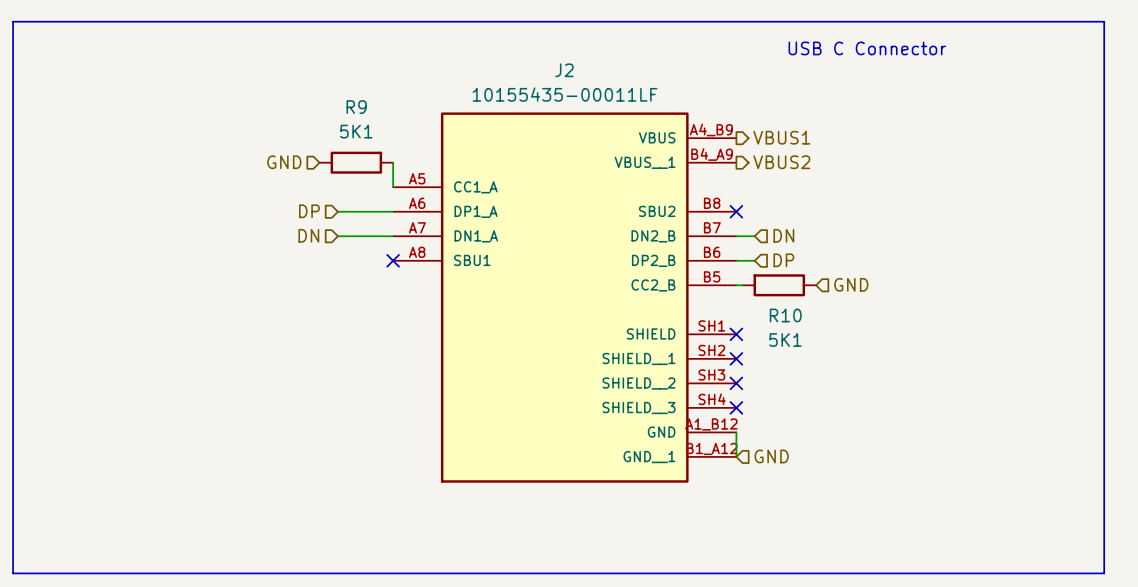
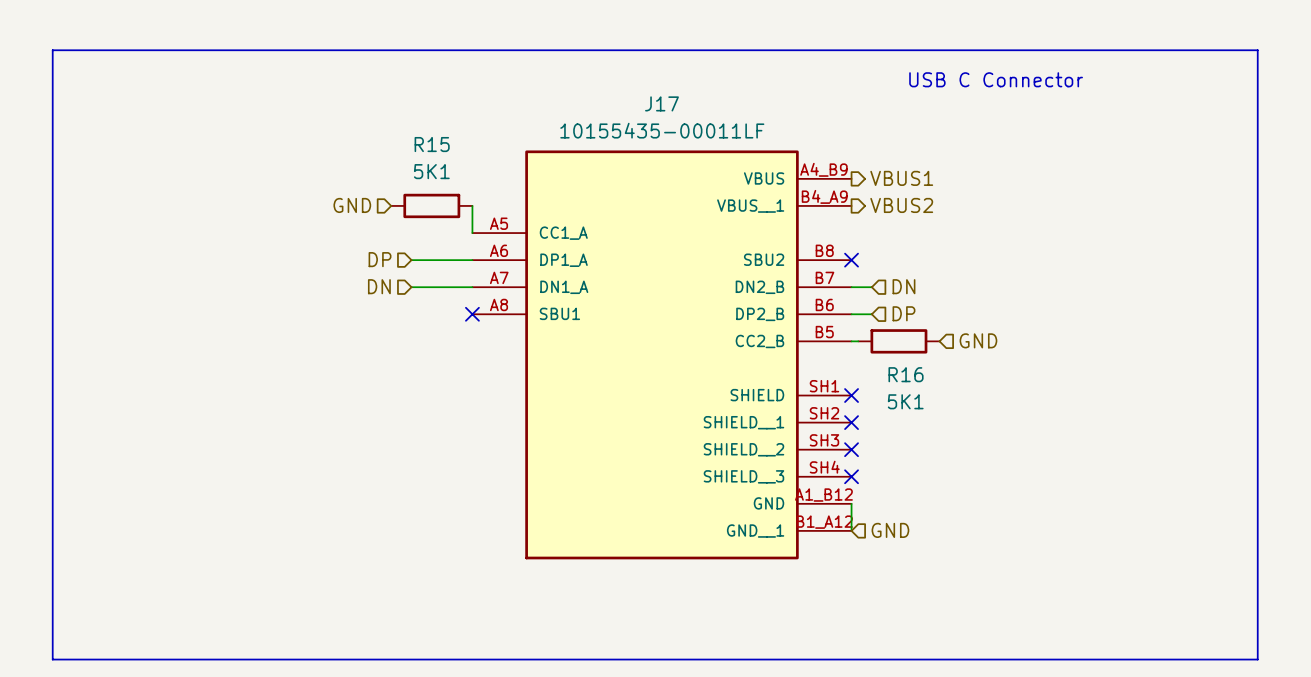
J2 name: J2 (564, 70) -> J17 (661, 103)
R9 name: R9 (356, 107) -> R15 (432, 144)
R10 name: R10 (785, 315) -> R16 (906, 374)

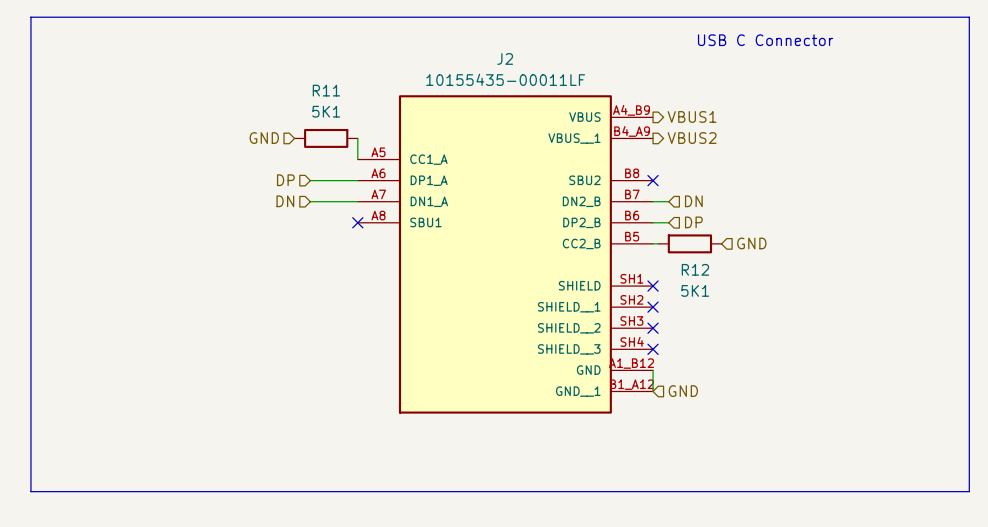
J17 name: J17 (661, 103) -> J2 (505, 58)
R15 name: R15 (432, 144) -> R11 (326, 90)
R16 name: R16 (906, 374) -> R12 (695, 269)

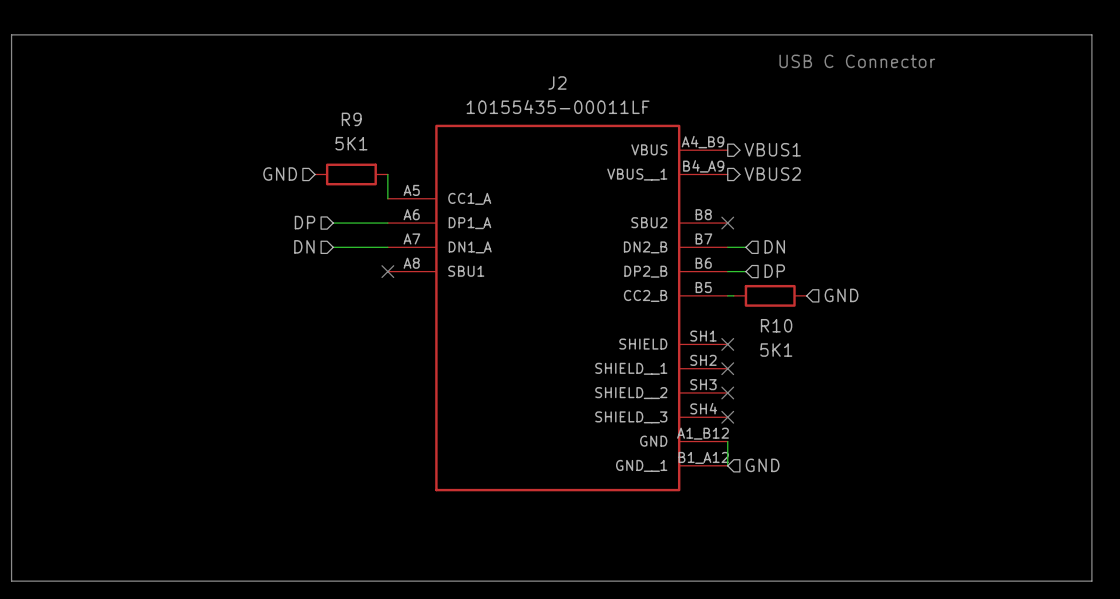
R11 name: R11 (326, 90) -> R9 (351, 119)
R12 name: R12 (695, 269) -> R10 (776, 325)

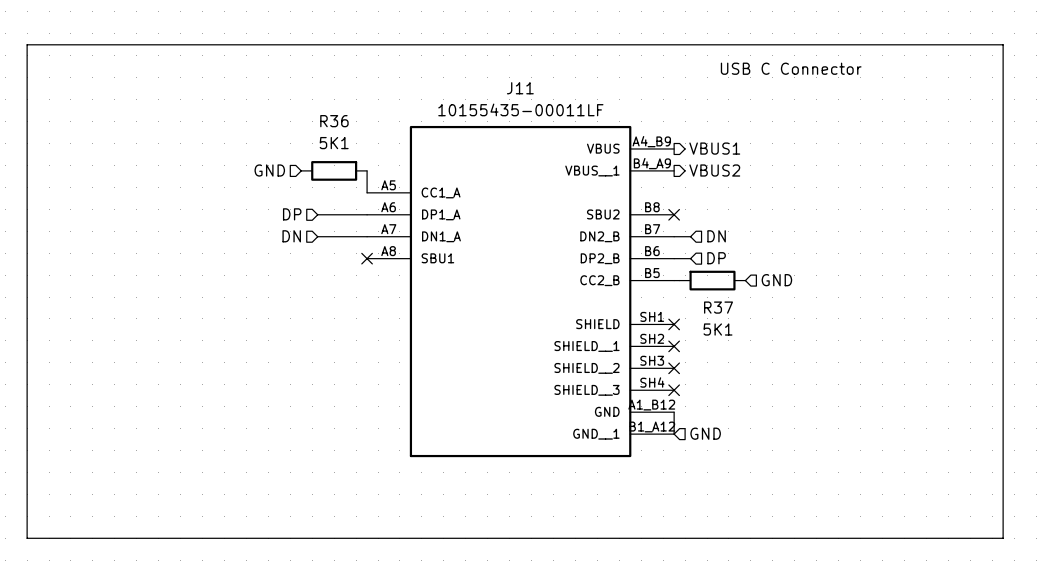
J2 name: J2 (557, 82) -> J11 (520, 88)
R9 name: R9 (351, 119) -> R36 (334, 121)
R10 name: R10 (776, 325) -> R37 (718, 307)

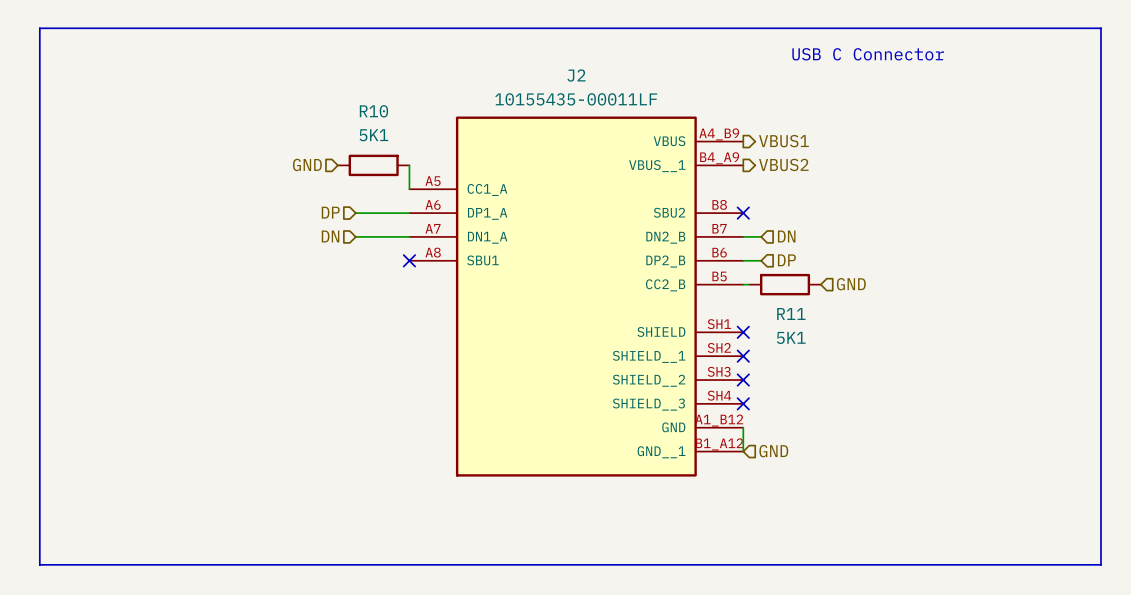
J11 name: J11 (520, 88) -> J2 (576, 75)
R36 name: R36 (334, 121) -> R10 (373, 111)
R37 name: R37 (718, 307) -> R11 (791, 314)

